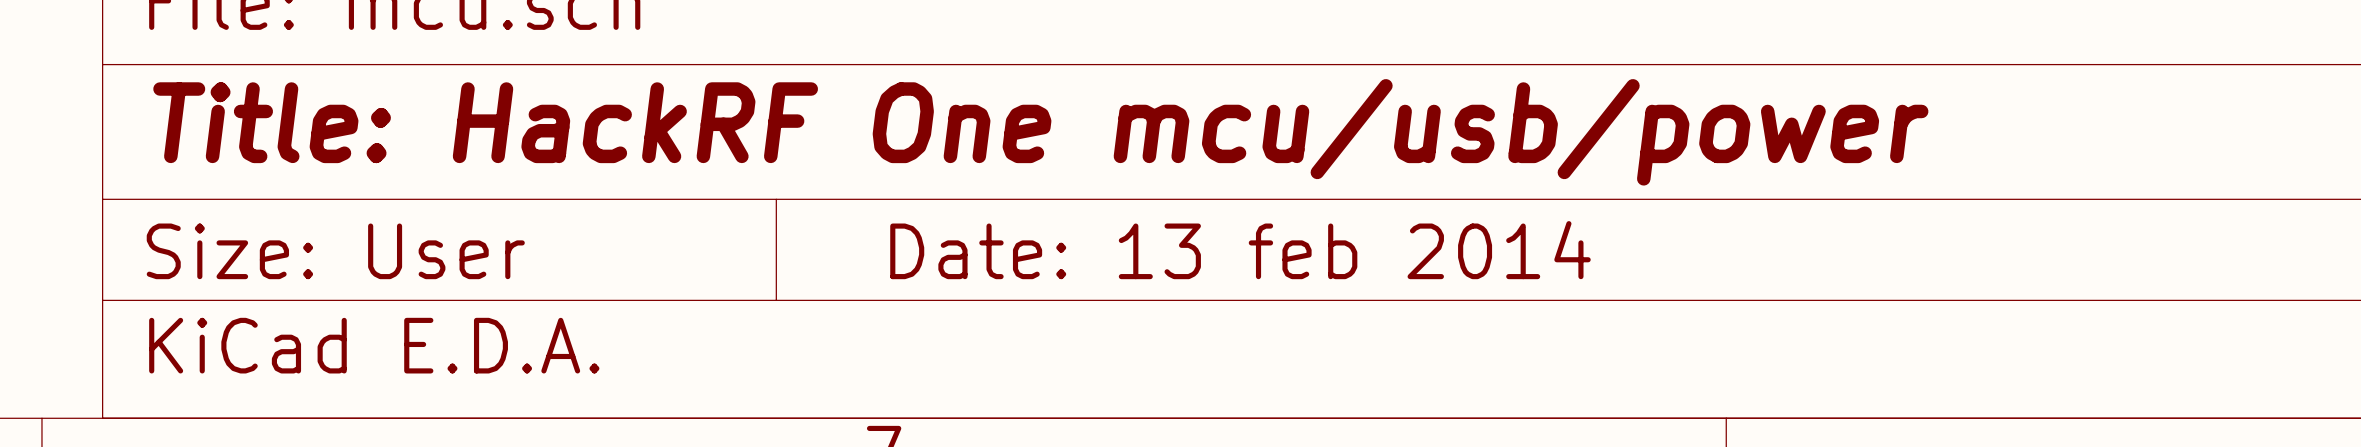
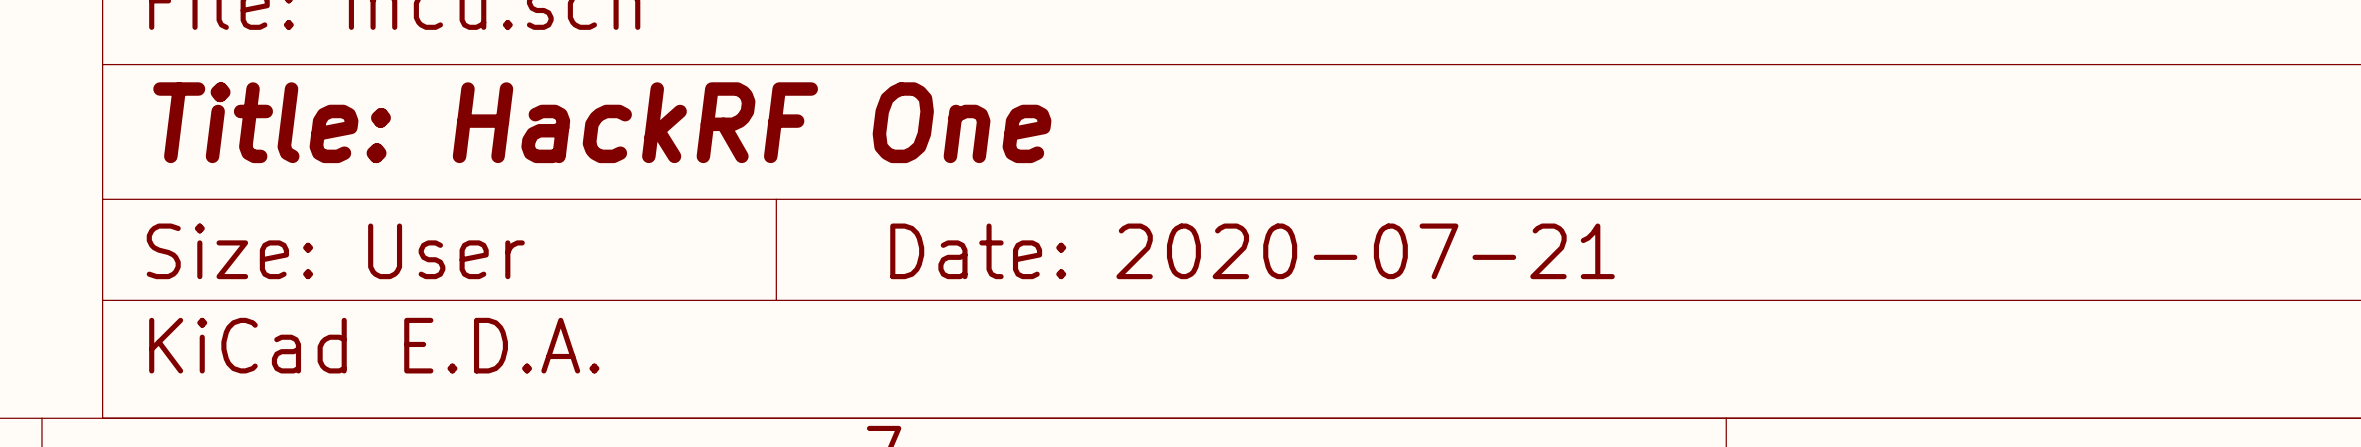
title block: Title: HackRF One mcu/usb/power (1040, 132) -> Title: HackRF One (602, 122)
title block: Date: 13 feb 2014 (1240, 250) -> Date: 2020-07-21 (1252, 251)

